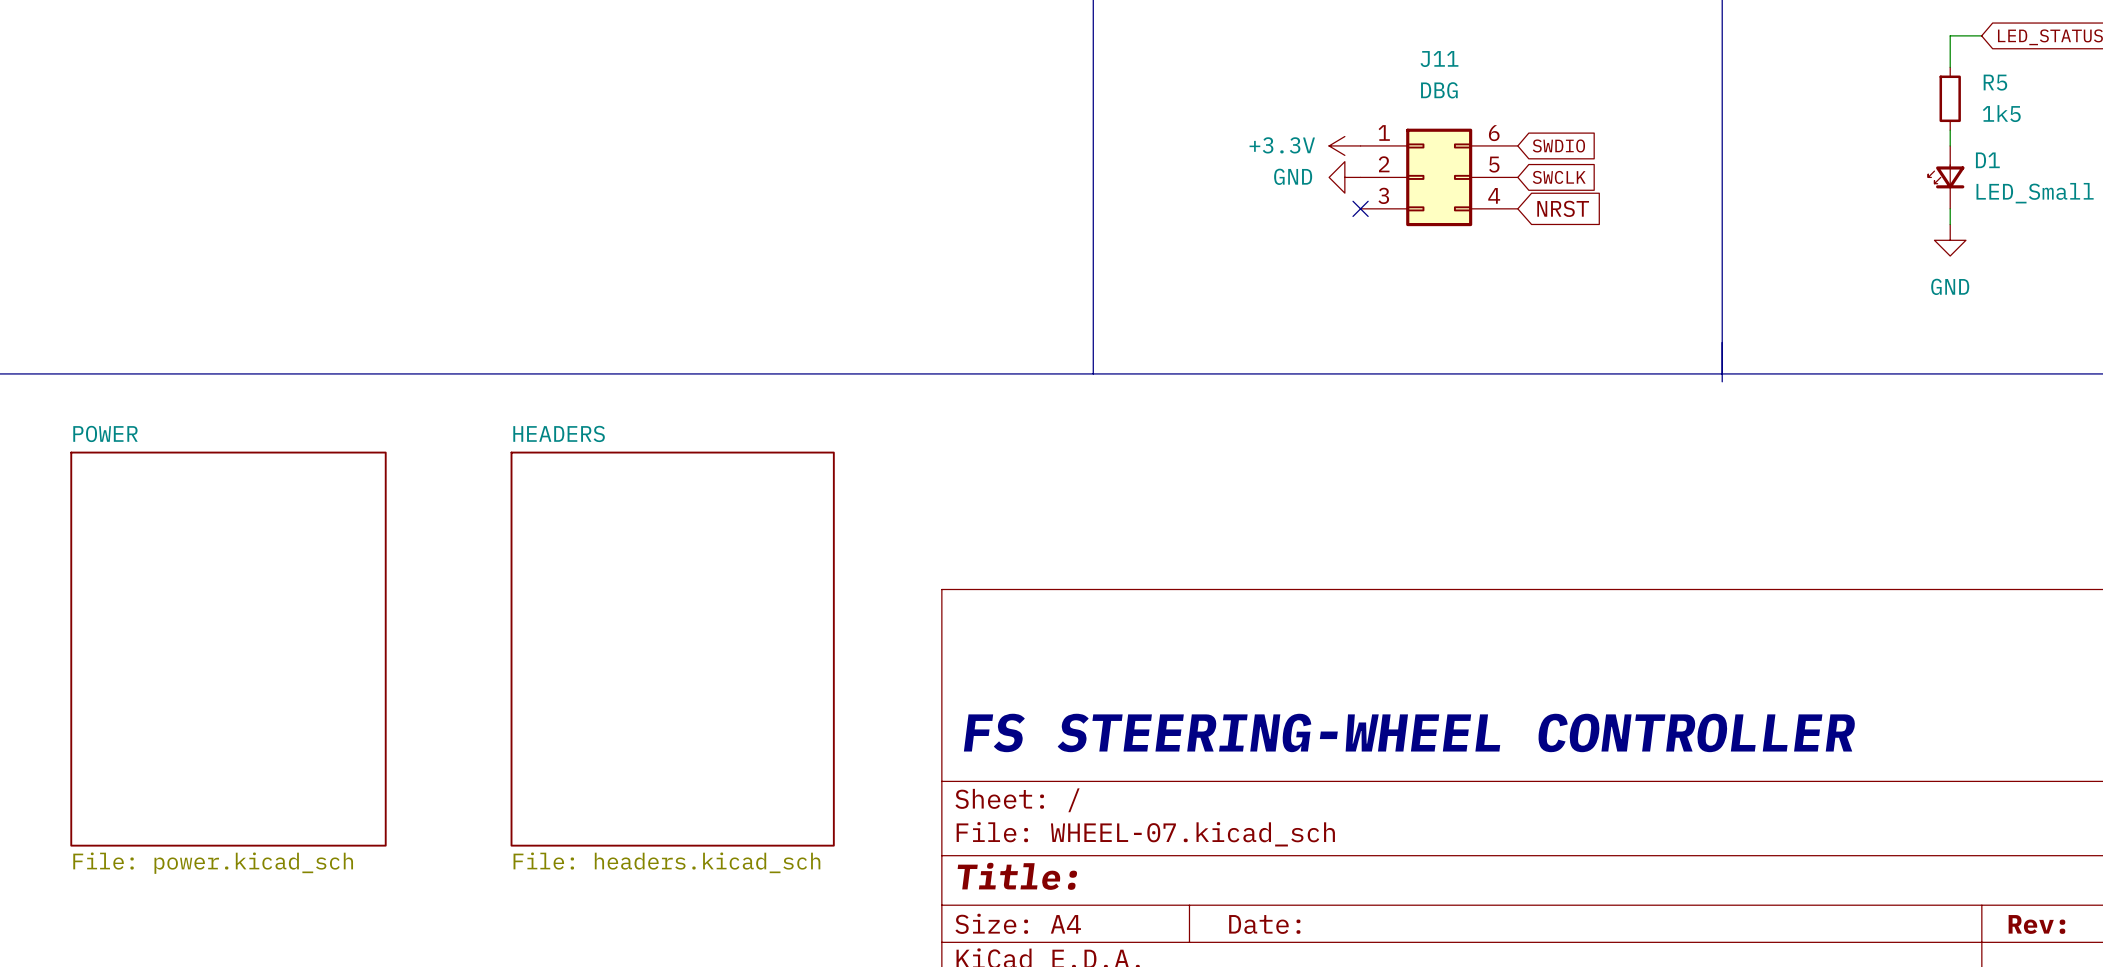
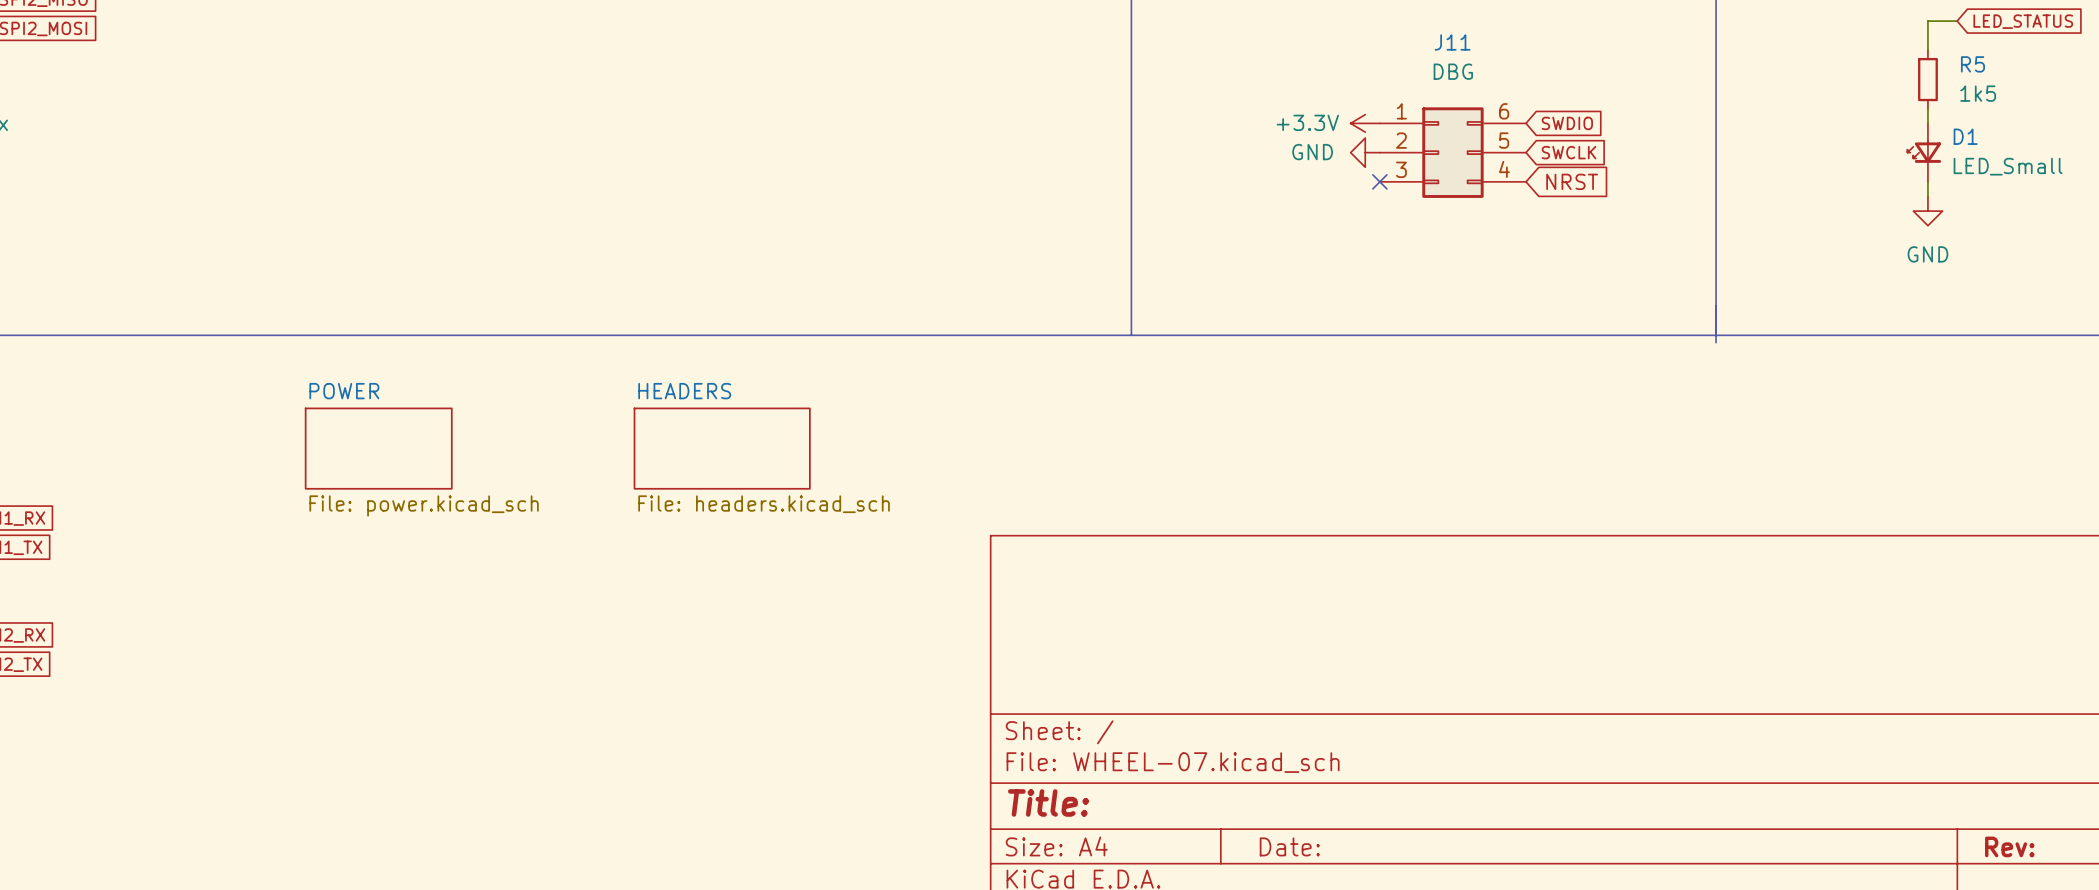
sheet POWER: none -> File: power.kicad_sch (378, 448)
sheet HEADERS: none -> File: headers.kicad_sch (722, 448)
sheet POWER: File: power.kicad_sch (228, 649) -> none
sheet HEADERS: File: headers.kicad_sch (672, 649) -> none
text: FS STEERING-WHEEL CONTROLLER (1409, 732) -> none

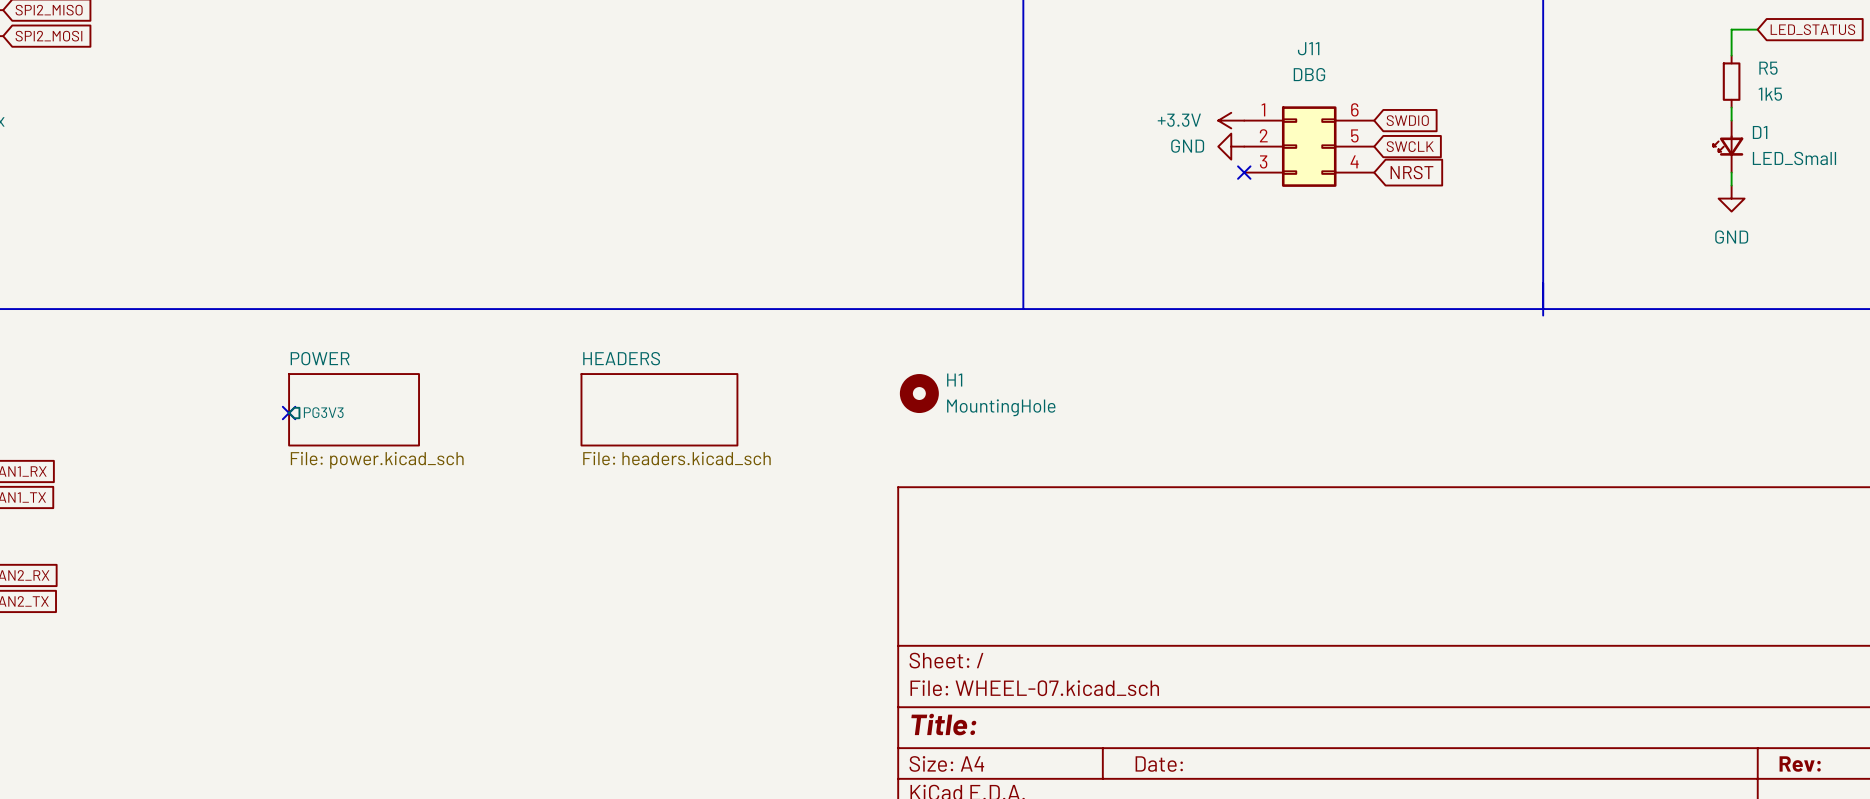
H1: none -> MountingHole (919, 393)
sheet pin: none -> PG3V3 (323, 412)
no-connect mark: none -> (289, 413)

